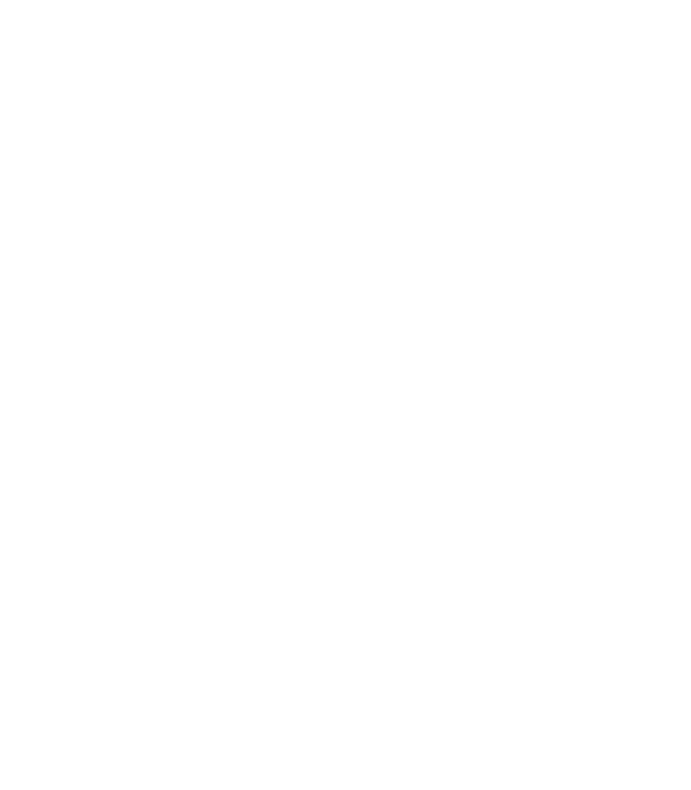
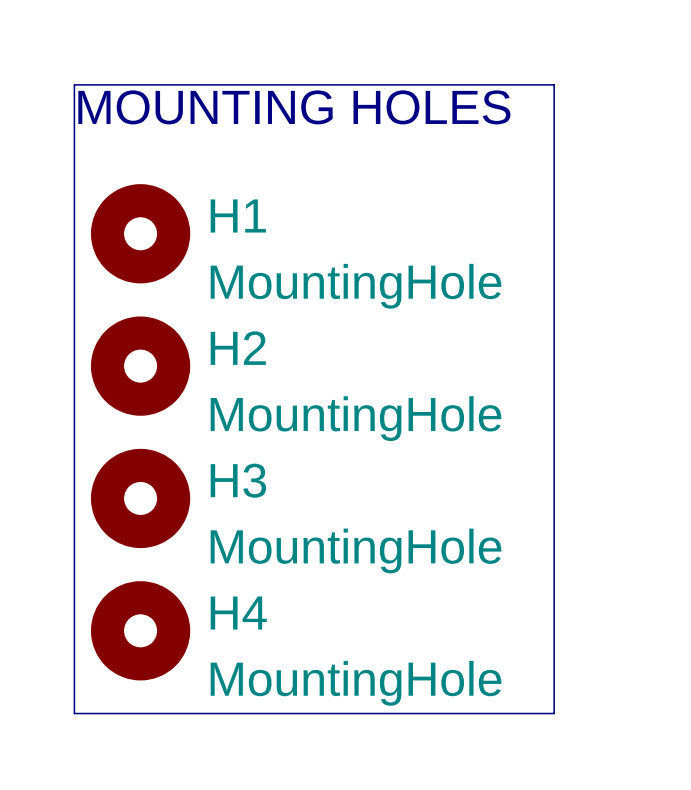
line: none -> (74, 84) (74, 713) (554, 713) (554, 84) (74, 84)
text: none -> MOUNTING HOLES (294, 107)
H1: none -> MountingHole (140, 233)
H2: none -> MountingHole (140, 366)
H3: none -> MountingHole (140, 498)
H4: none -> MountingHole (140, 630)

